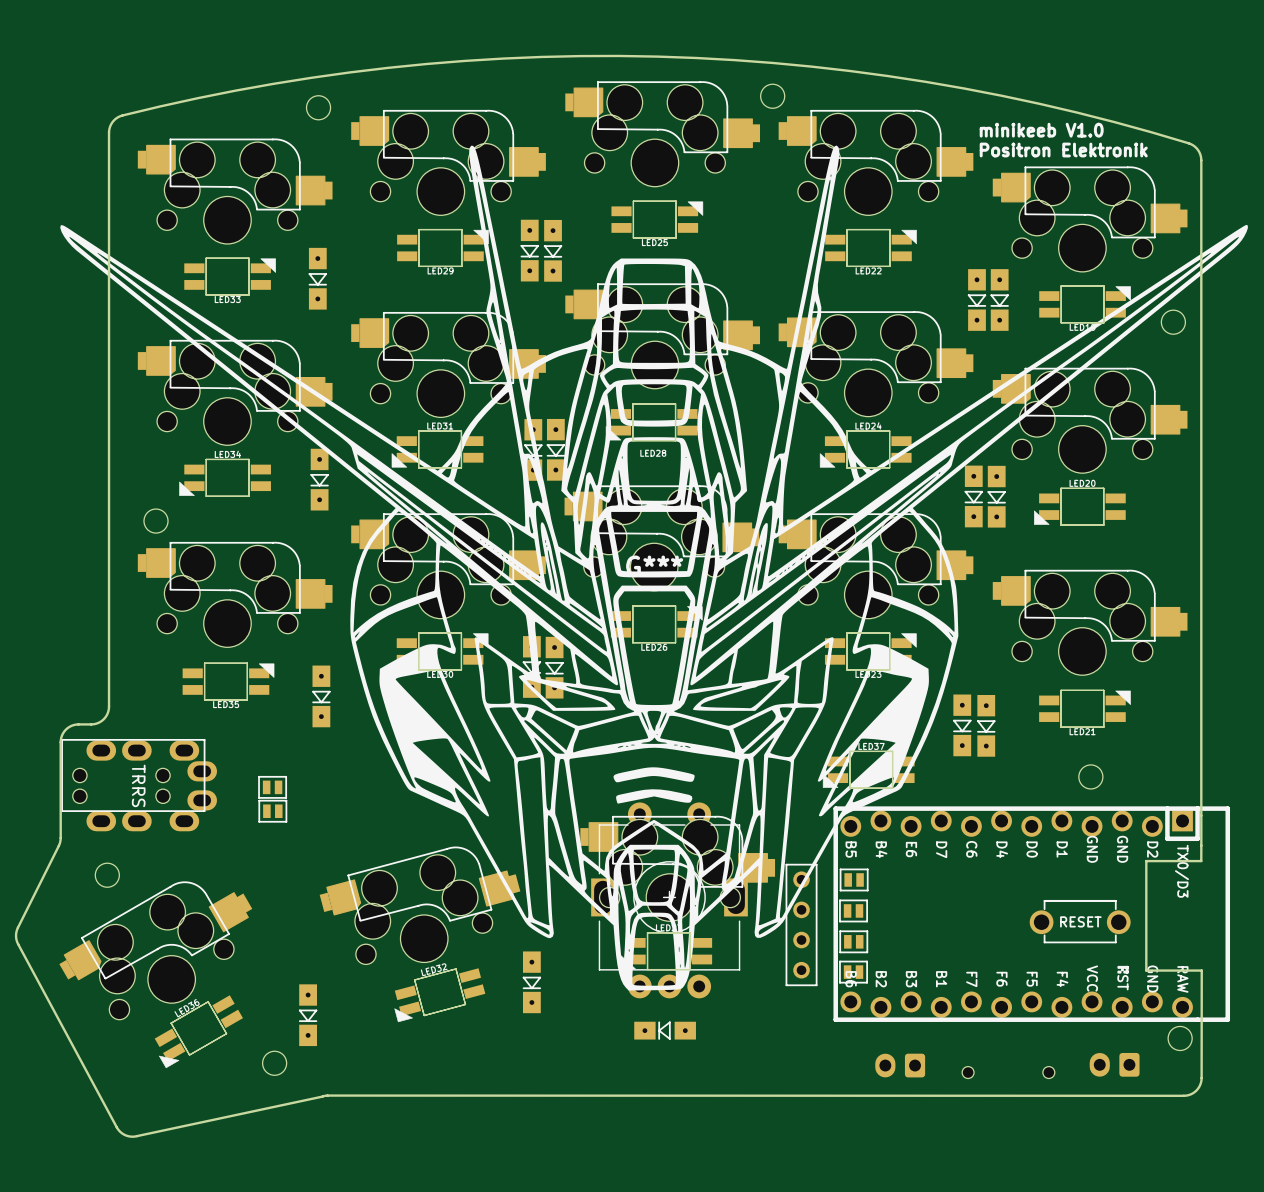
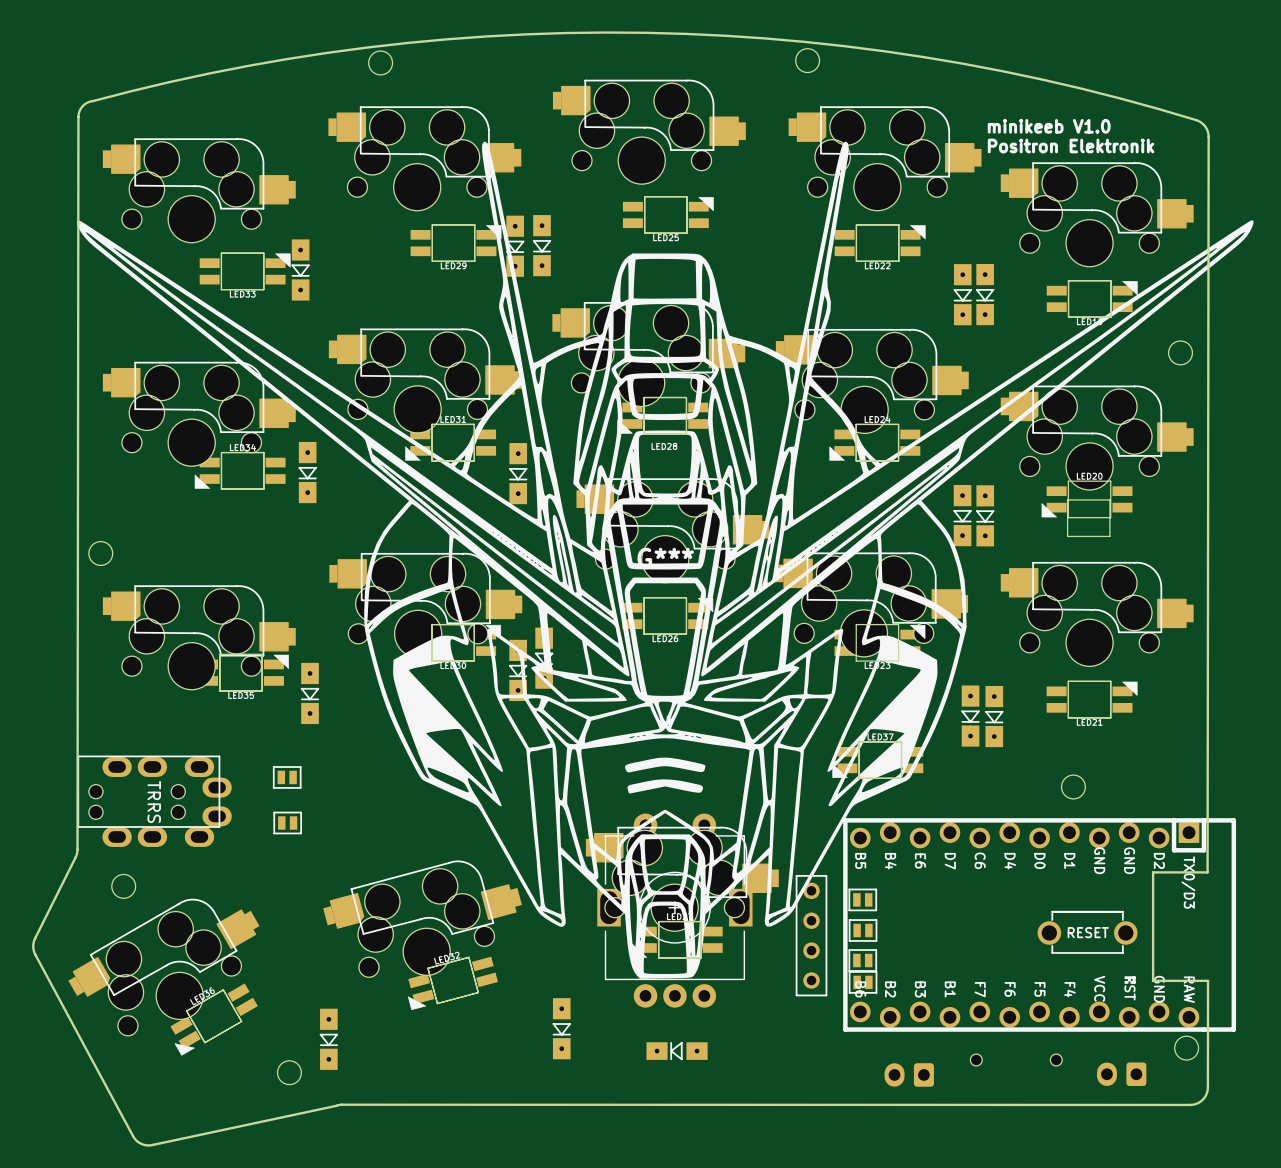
round board edge position: (772, 96) -> (807, 60)
round board edge position: (318, 107) -> (380, 62)
board edge: (122, 115) (112, 121) (109, 132) (108, 708) (106, 715) (100, 722) (71, 725) (62, 735) (60, 842) (17, 927) (16, 936) (18, 944) (120, 1132) (127, 1135) (135, 1136) (327, 1095) (1183, 1095) (1196, 1090) (1201, 1078) (1201, 970) (1146, 970) (1146, 861) (1201, 861) (1201, 160) (1199, 151) (1194, 146) (1151, 132) (1077, 112) (926, 81) (773, 62) (657, 56) (541, 56) (388, 67) (273, 83) (122, 115) -> (93, 101) (209, 73) (288, 58) (367, 47) (486, 36) (566, 33) (645, 32) (765, 38) (845, 46) (924, 57) (1002, 71) (1080, 88) (1157, 108) (1202, 123) (1207, 130) (1208, 136) (1207, 872) (1153, 872) (1153, 980) (1208, 980) (1207, 1087) (1202, 1099) (1190, 1104) (341, 1104) (151, 1145) (143, 1144) (136, 1140) (35, 954) (33, 946) (35, 938) (77, 851) (78, 117) (82, 106) (93, 101)
part position: (662, 133) -> (649, 131)
part position: (448, 162) -> (424, 158)
part position: (235, 191) -> (199, 190)
part position: (553, 250) -> (515, 246)
part position: (317, 278) -> (300, 270)
part position: (999, 299) -> (962, 294)
round board edge position: (1173, 322) -> (1180, 352)
part position: (662, 335) -> (648, 354)
part position: (876, 363) -> (872, 381)
part position: (448, 364) -> (425, 380)
part position: (235, 392) -> (199, 413)
part position: (1090, 420) -> (1097, 437)
part: (533, 449) -> none
part: (555, 449) -> none
part position: (319, 479) -> (307, 472)
part: none -> (518, 473)
part: (973, 496) -> none
part: (996, 496) -> none
part position: (1082, 506) -> (1088, 518)
round board edge position: (156, 521) -> (100, 553)
part: none -> (962, 515)
part: none -> (985, 515)
part position: (448, 565) -> (425, 605)
part position: (876, 565) -> (871, 604)
part position: (235, 594) -> (199, 637)
part: (868, 651) -> none
part position: (554, 667) -> (518, 670)
part position: (321, 696) -> (310, 693)
round board edge position: (1090, 776) -> (1073, 786)
part position: (139, 785) -> (154, 801)
part footprint: [591, 802, 748, 999] -> [585, 826, 779, 932]
part position: (272, 811) -> (287, 822)
part: (677, 868) -> none
round board edge position: (107, 875) -> (123, 886)
part position: (854, 879) -> (863, 982)
part position: (420, 905) -> (422, 918)
part position: (1031, 914) -> (1039, 924)
part: none -> (674, 910)
part position: (1080, 921) -> (1087, 932)
part position: (801, 924) -> (811, 935)
part position: (155, 950) -> (163, 967)
part: (531, 982) -> none
part position: (308, 1015) -> (328, 1039)
part position: (665, 1030) -> (677, 1051)
round board edge position: (1180, 1038) -> (1186, 1048)
part: none -> (561, 1028)
round board edge position: (274, 1063) -> (289, 1072)
part position: (1114, 1064) -> (1121, 1074)
part position: (900, 1065) -> (909, 1074)

